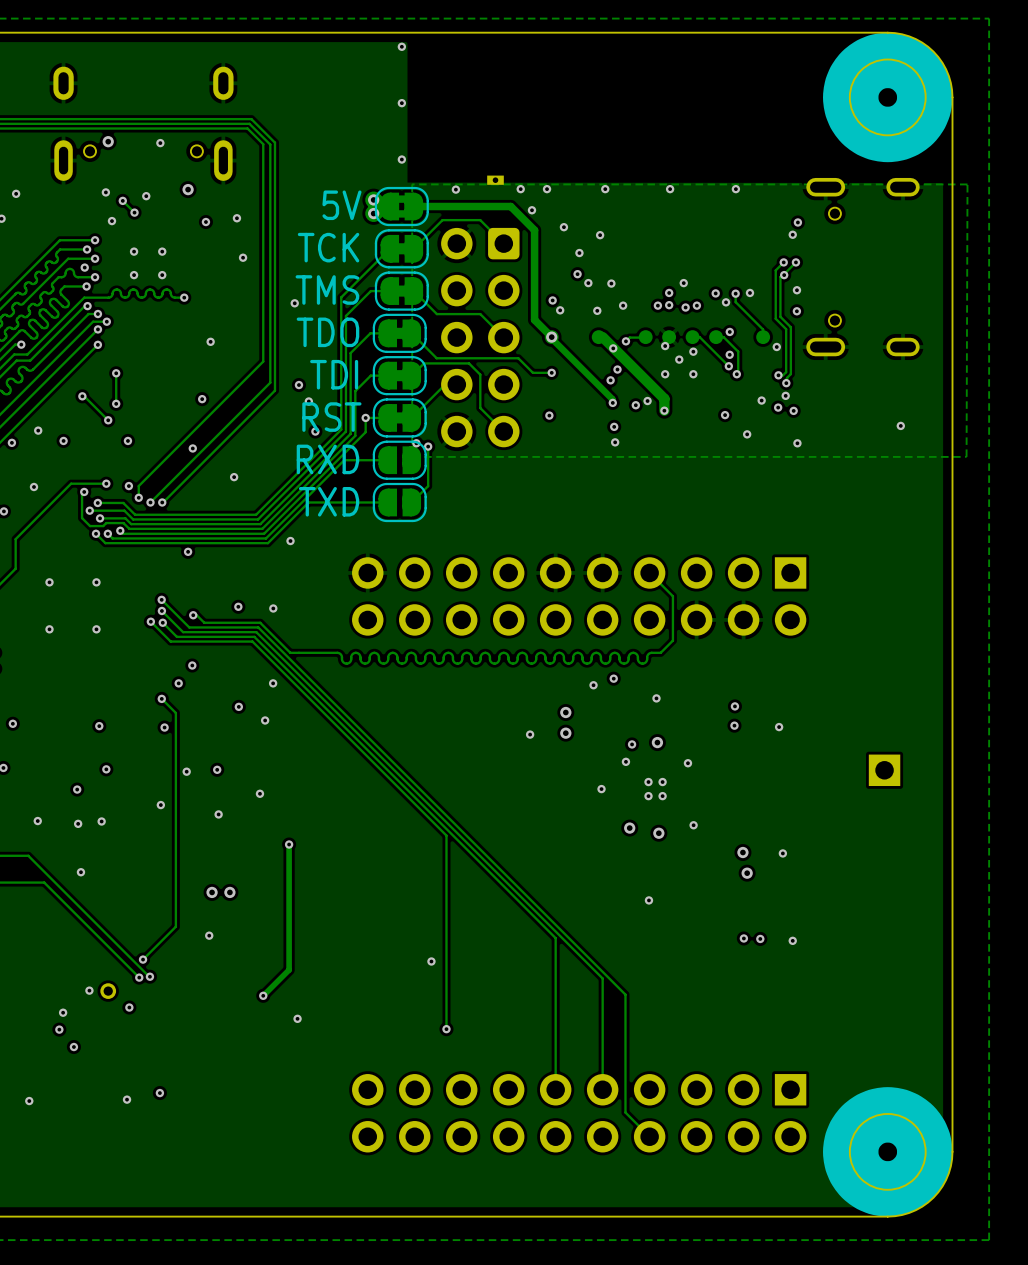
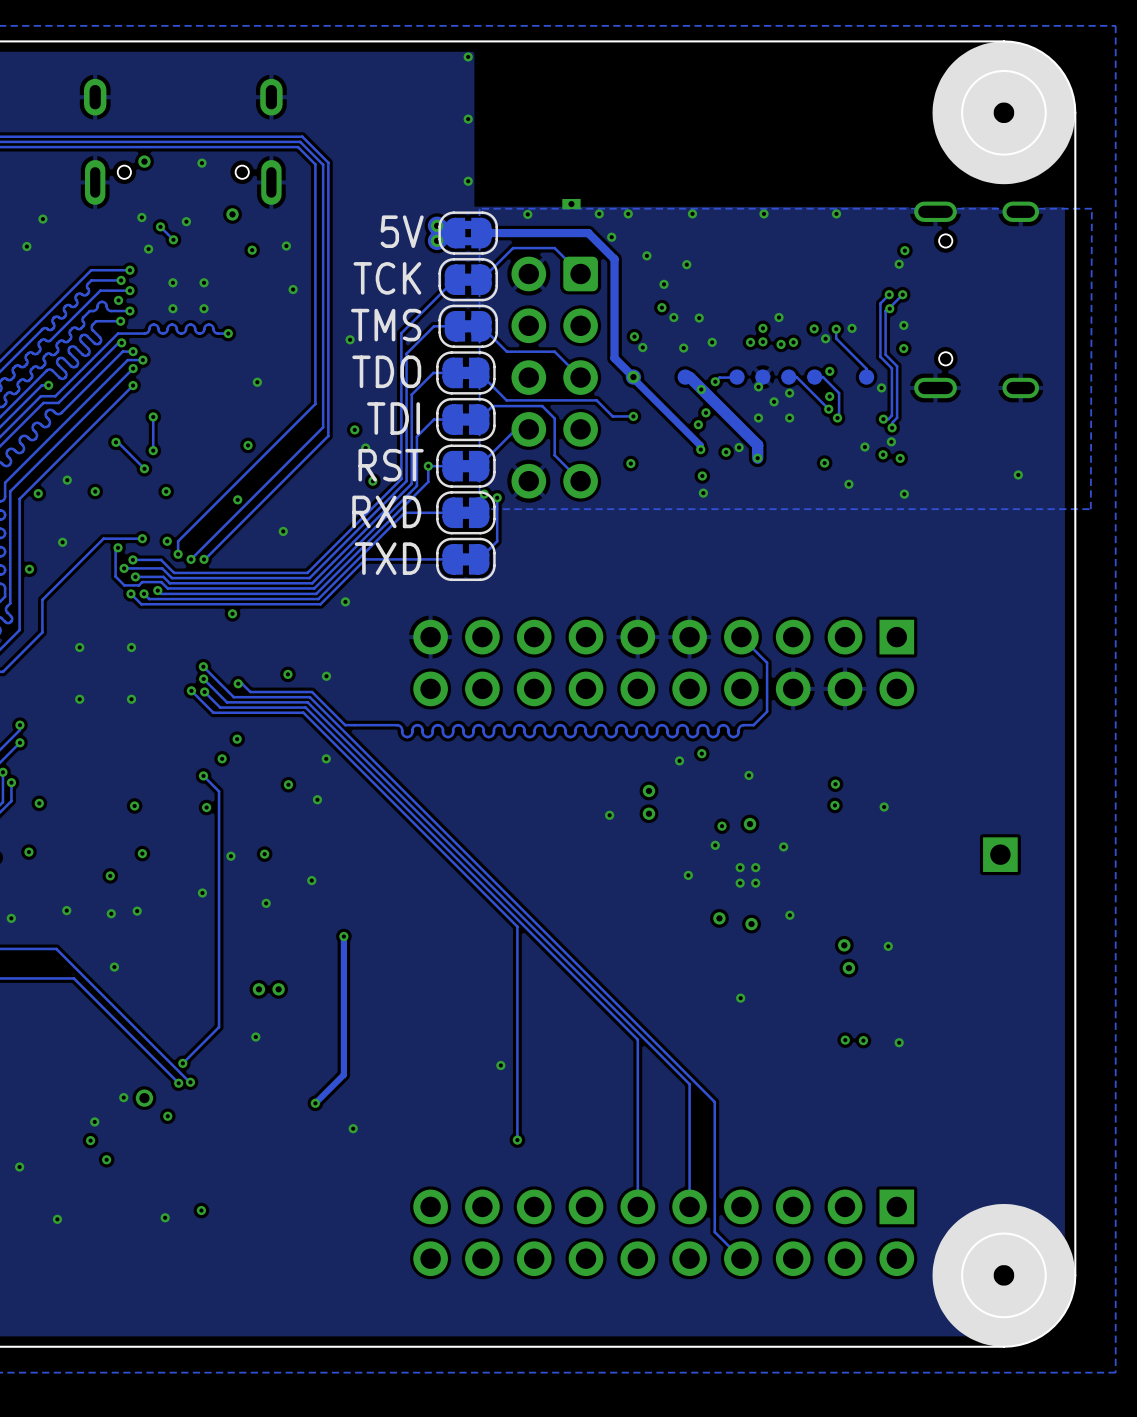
part footprint: [372, 440, 427, 480] -> [436, 491, 496, 535]
part footprint: [372, 482, 427, 523] -> [436, 537, 496, 582]

